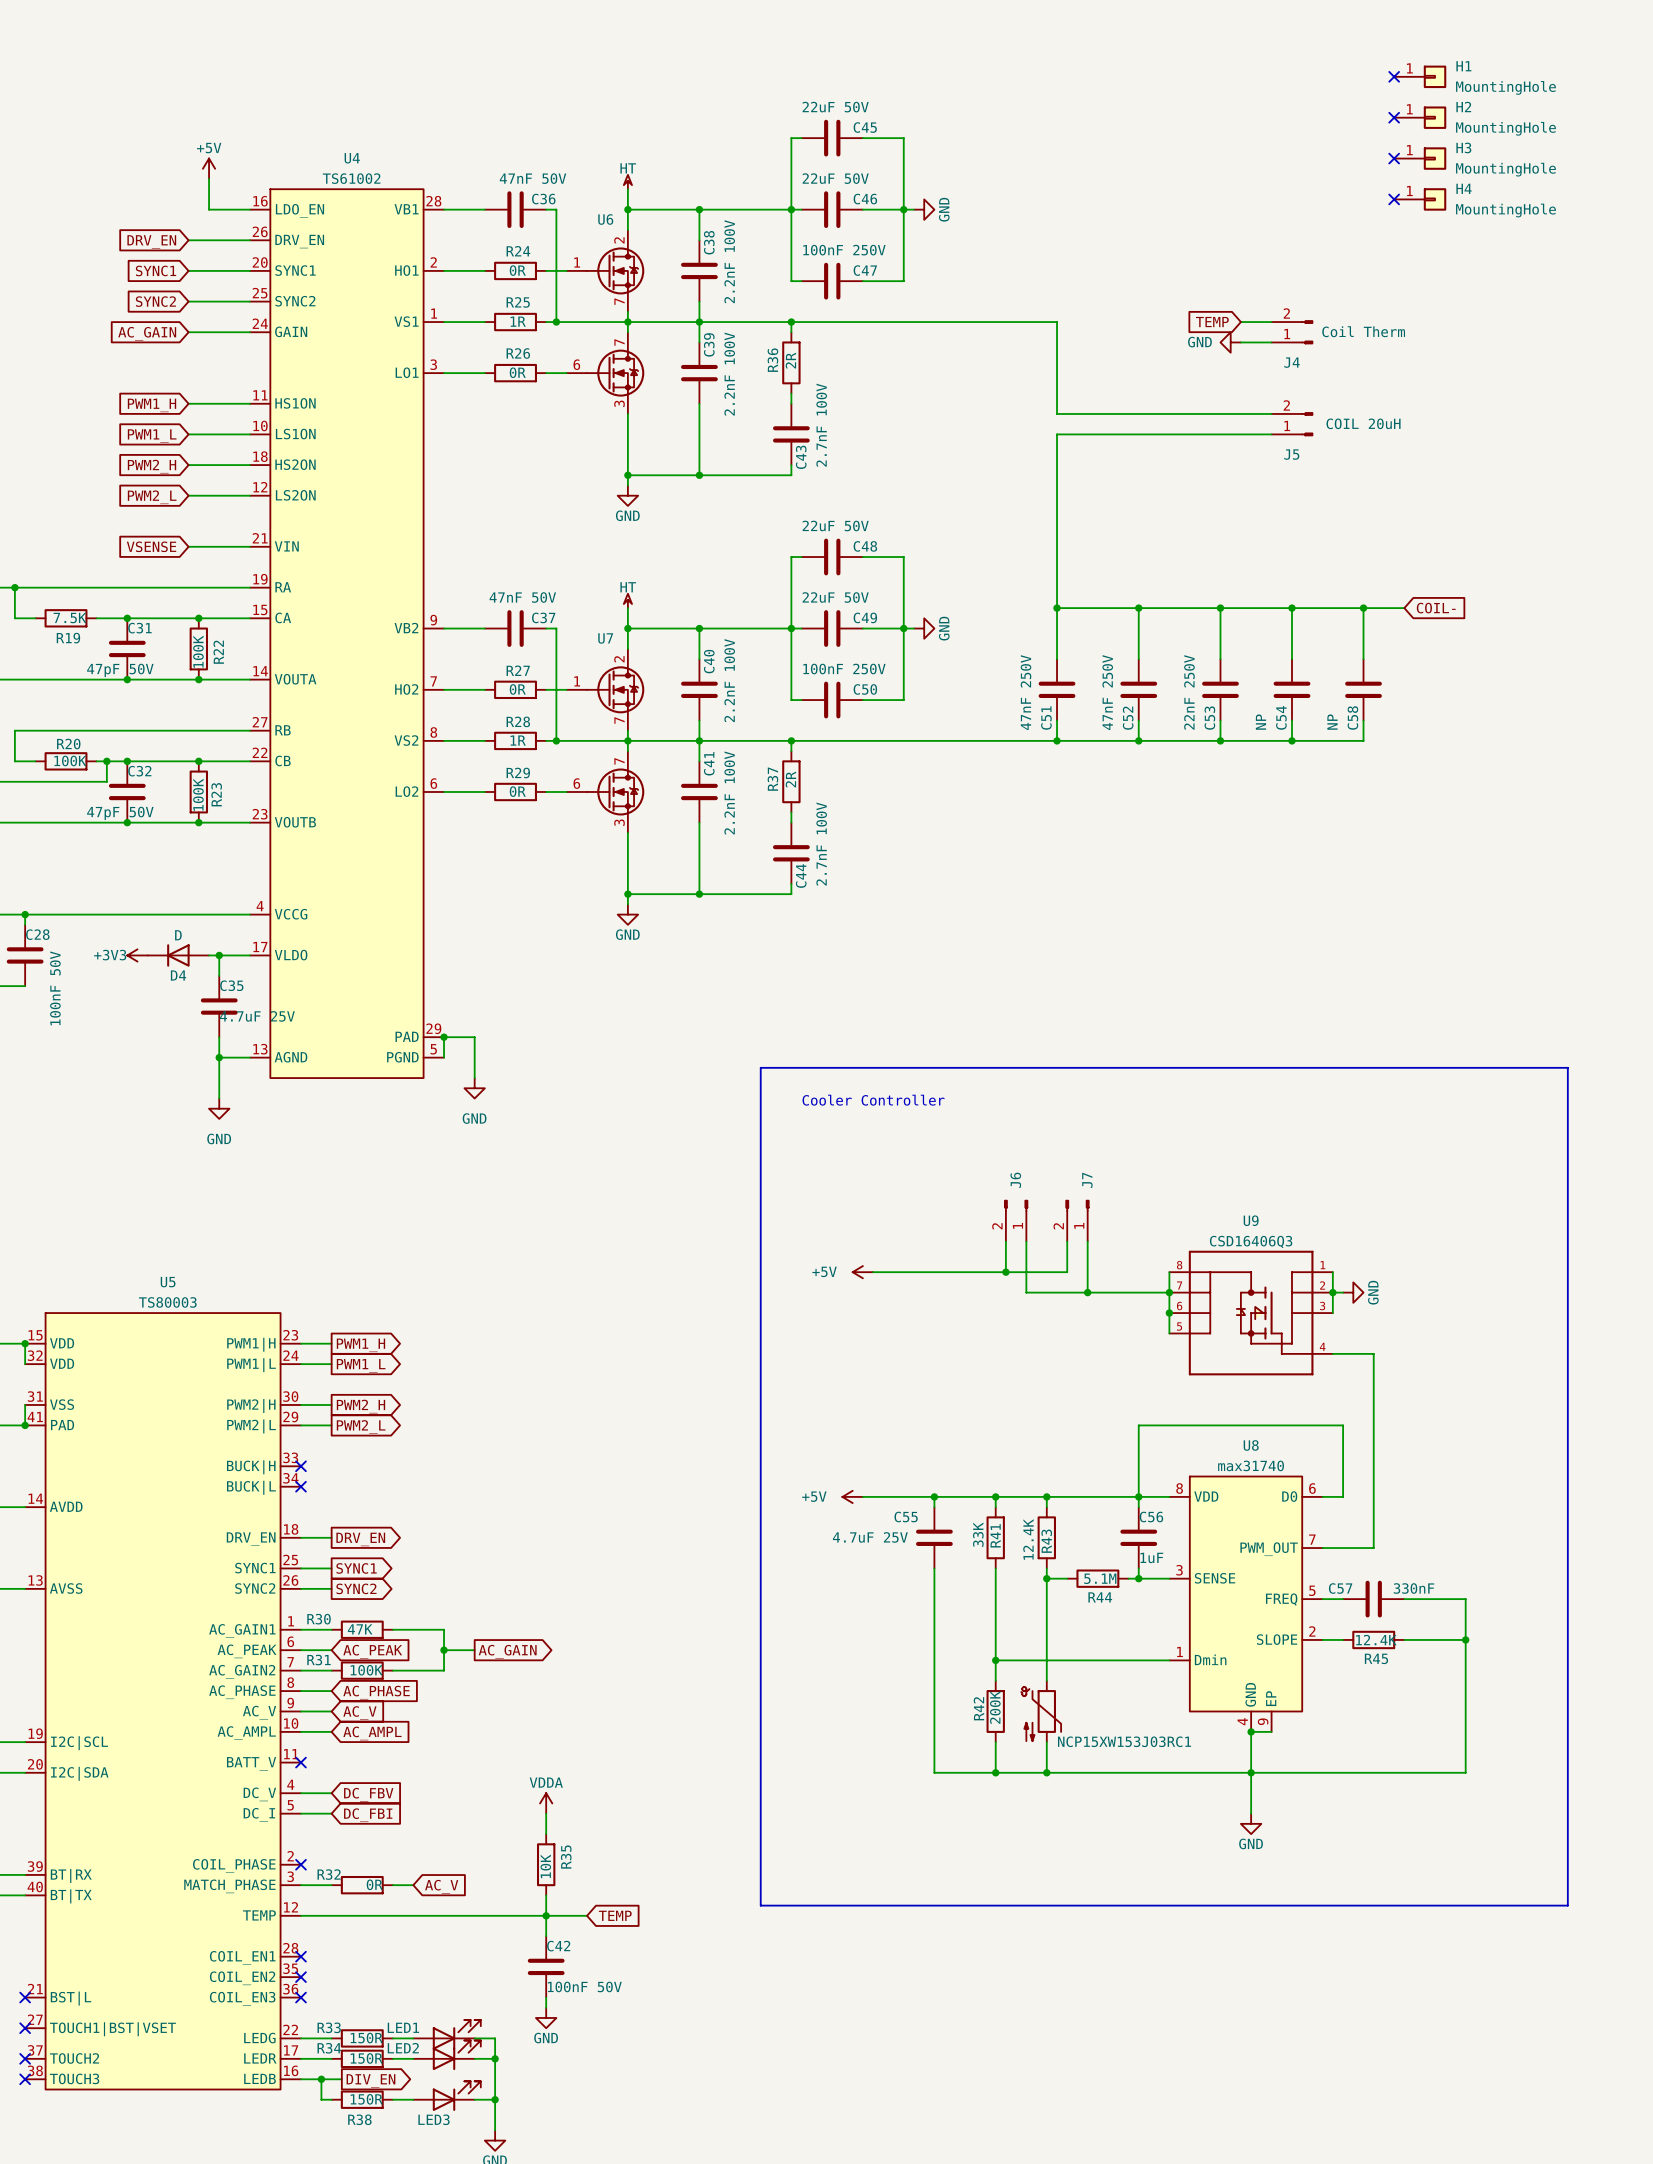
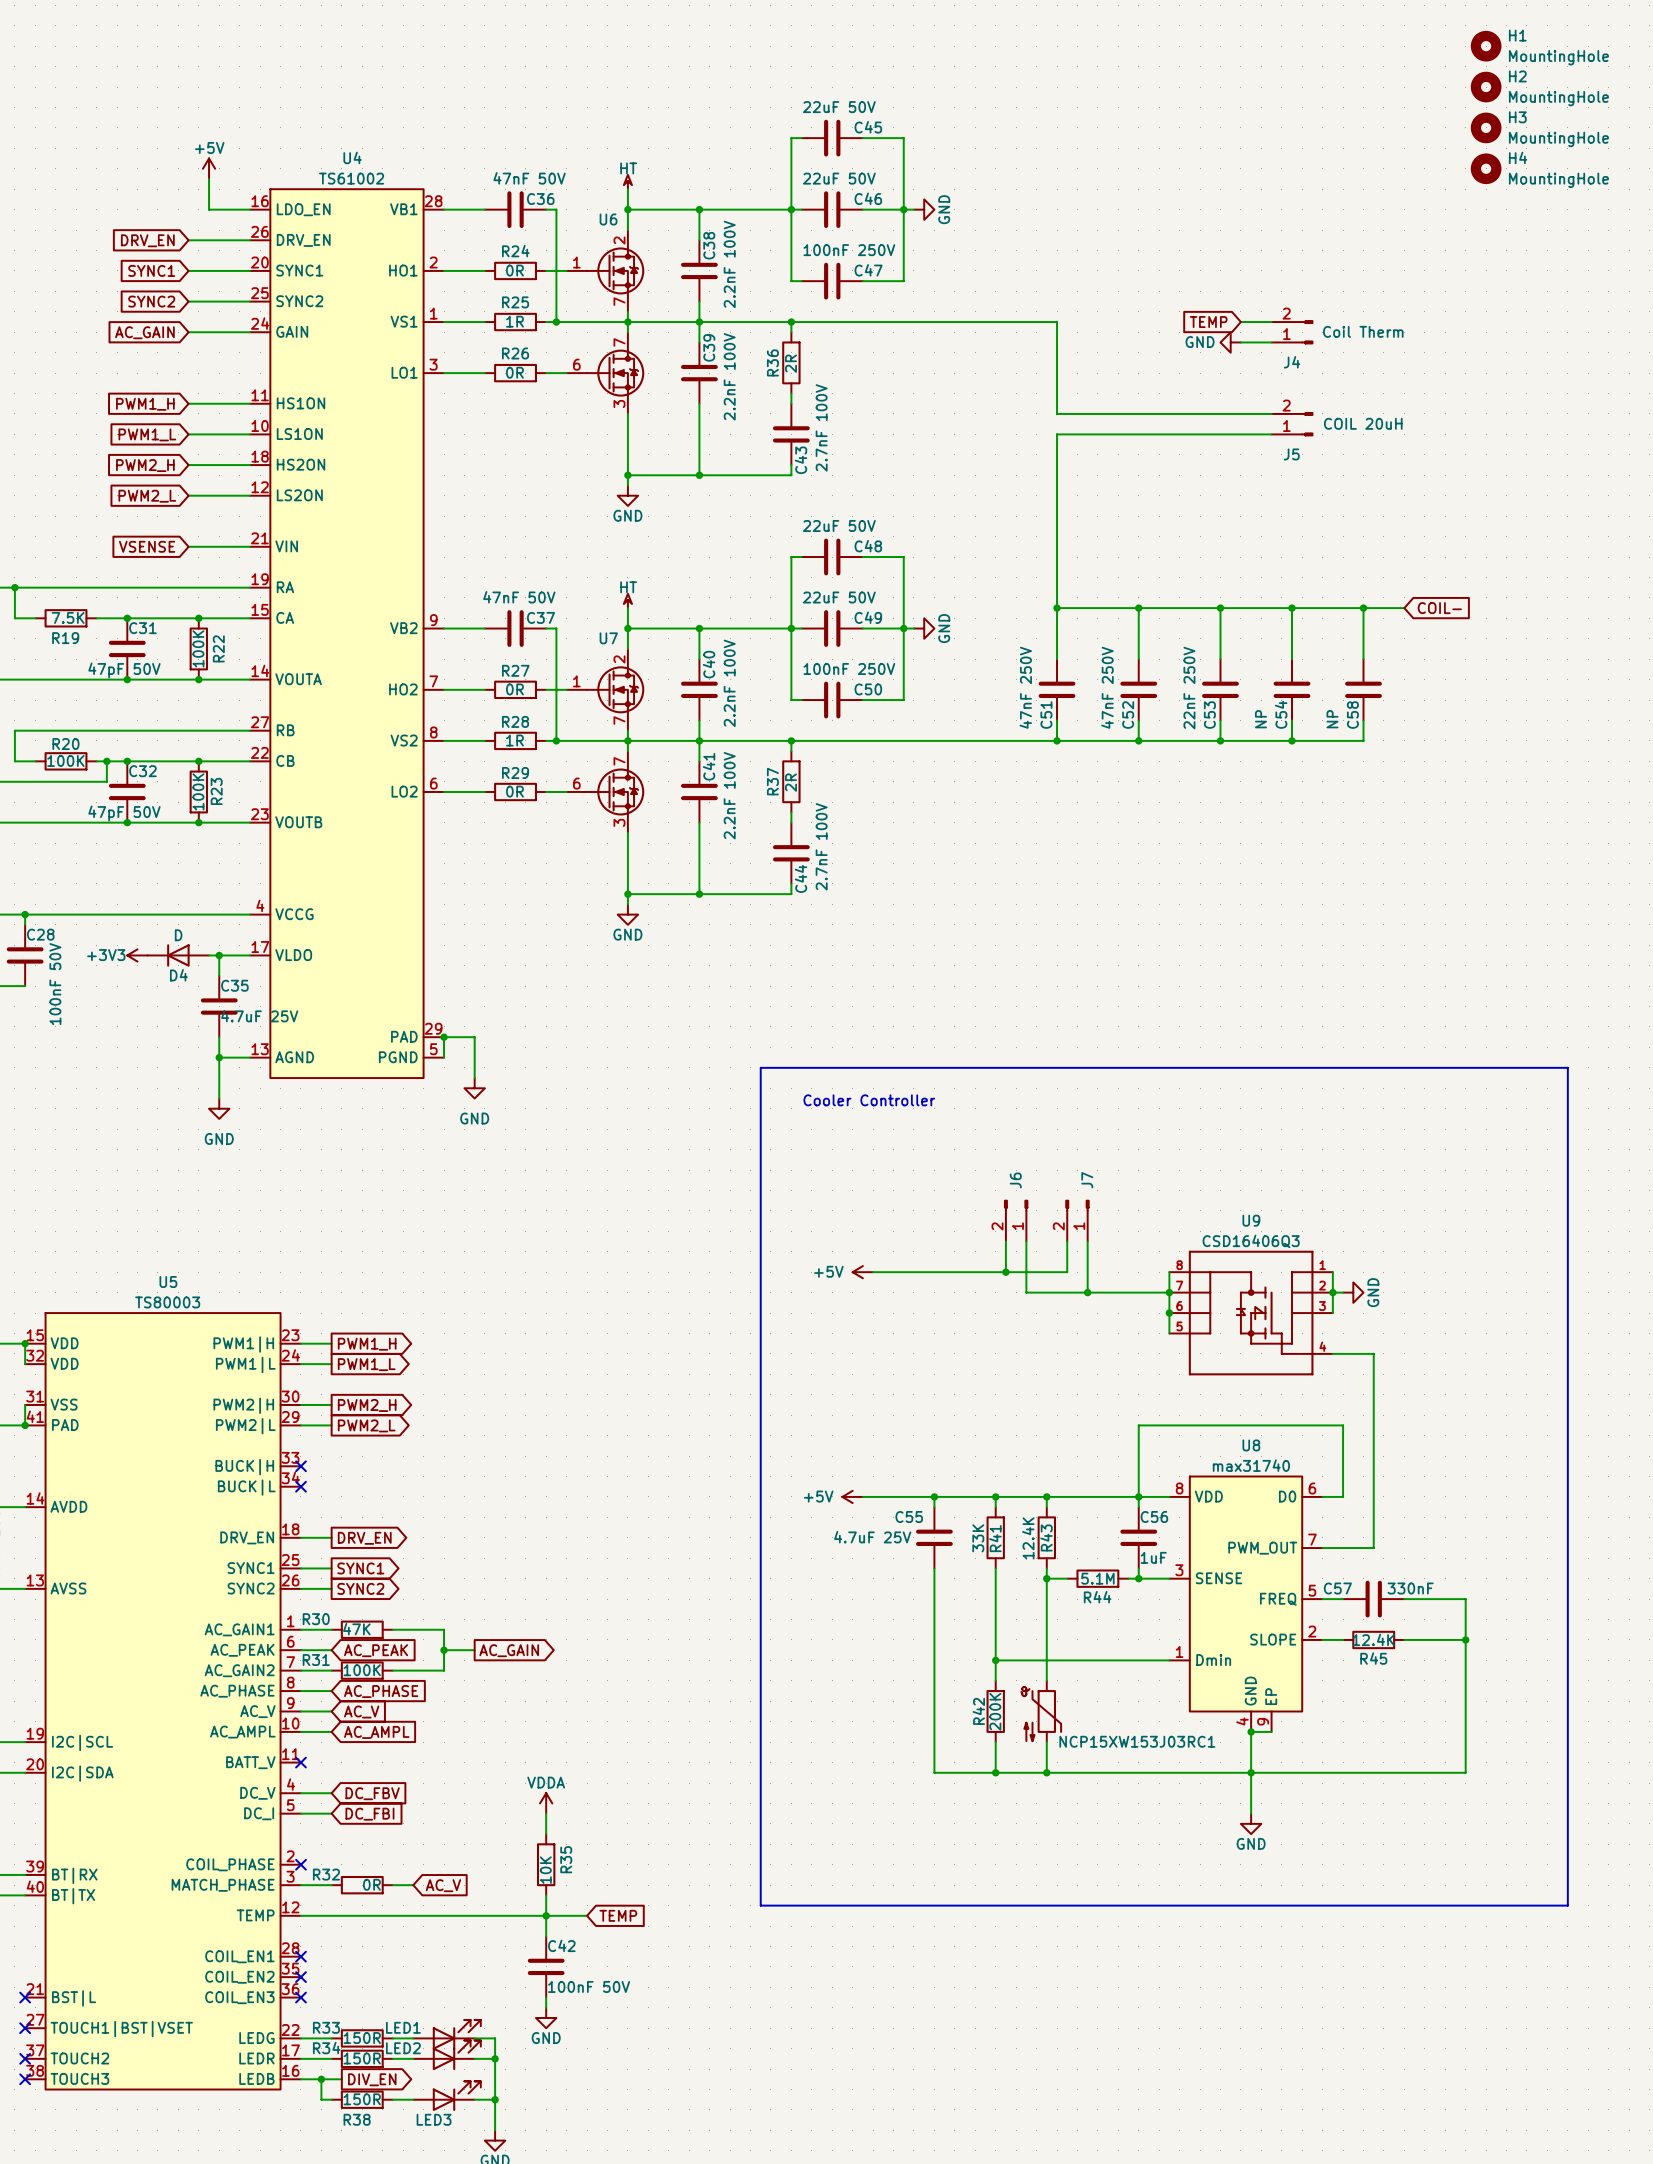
H1 symbol: [1394, 65, 1447, 89] -> [1470, 30, 1502, 62]
no-connect mark: (1394, 76) -> none
H2 symbol: [1394, 106, 1447, 129] -> [1470, 71, 1502, 103]
no-connect mark: (1394, 117) -> none
H3 symbol: [1394, 147, 1447, 170] -> [1470, 112, 1502, 144]
no-connect mark: (1394, 158) -> none
H4 symbol: [1394, 188, 1447, 211] -> [1470, 153, 1502, 185]
no-connect mark: (1394, 199) -> none

